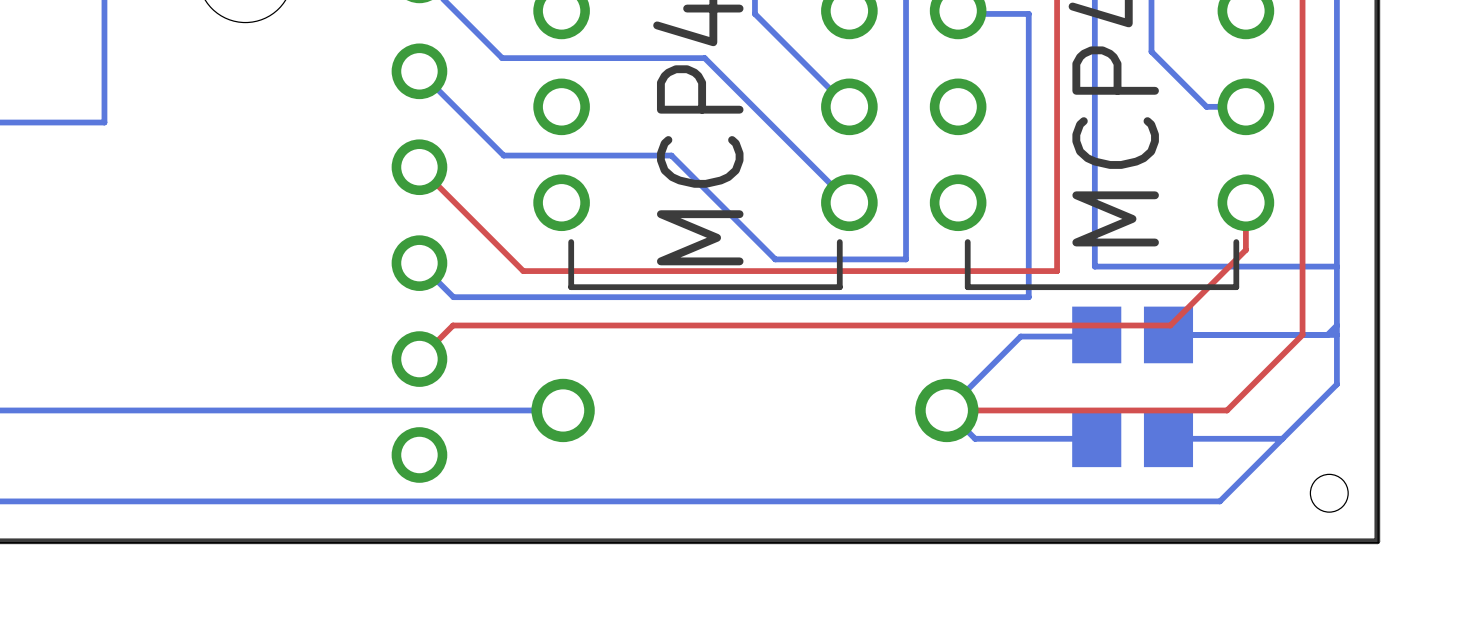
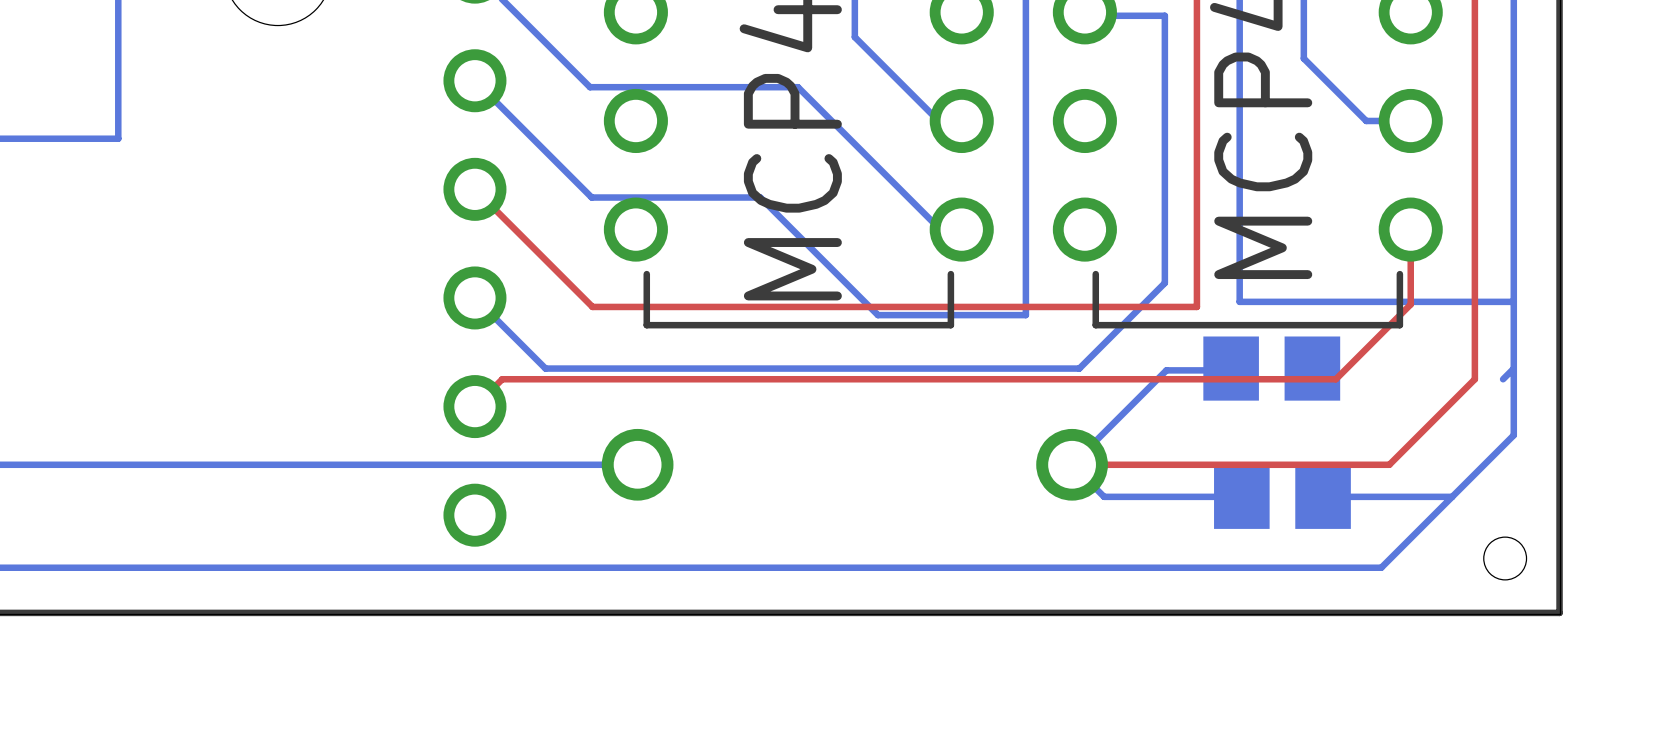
bottom track: (754, 13) (849, 106) -> (854, 15) (854, 37) (961, 142)
bottom track: (502, 58) (704, 58) (849, 202) -> (568, 65) (590, 87) (797, 87) (961, 250)
bottom track: (503, 155) (671, 155) (775, 259) (906, 259) -> (570, 176) (591, 197) (760, 197) (877, 315) (1025, 315) (1025, 293)
bottom track: (1028, 249) (1028, 297) (453, 297) -> (1164, 283) (1079, 368) (545, 368) (513, 336)
top track: (1245, 249) (1170, 325) (453, 325) (443, 334) -> (1410, 283) (1410, 304) (1335, 379) (502, 379)
bottom track: (1096, 334) (1095, 336) (1020, 336) -> (1231, 368) (1229, 370) (1166, 370) (1155, 381)
part position: (1132, 334) -> (1271, 368)
bottom track: (1168, 334) (1336, 334) -> none

